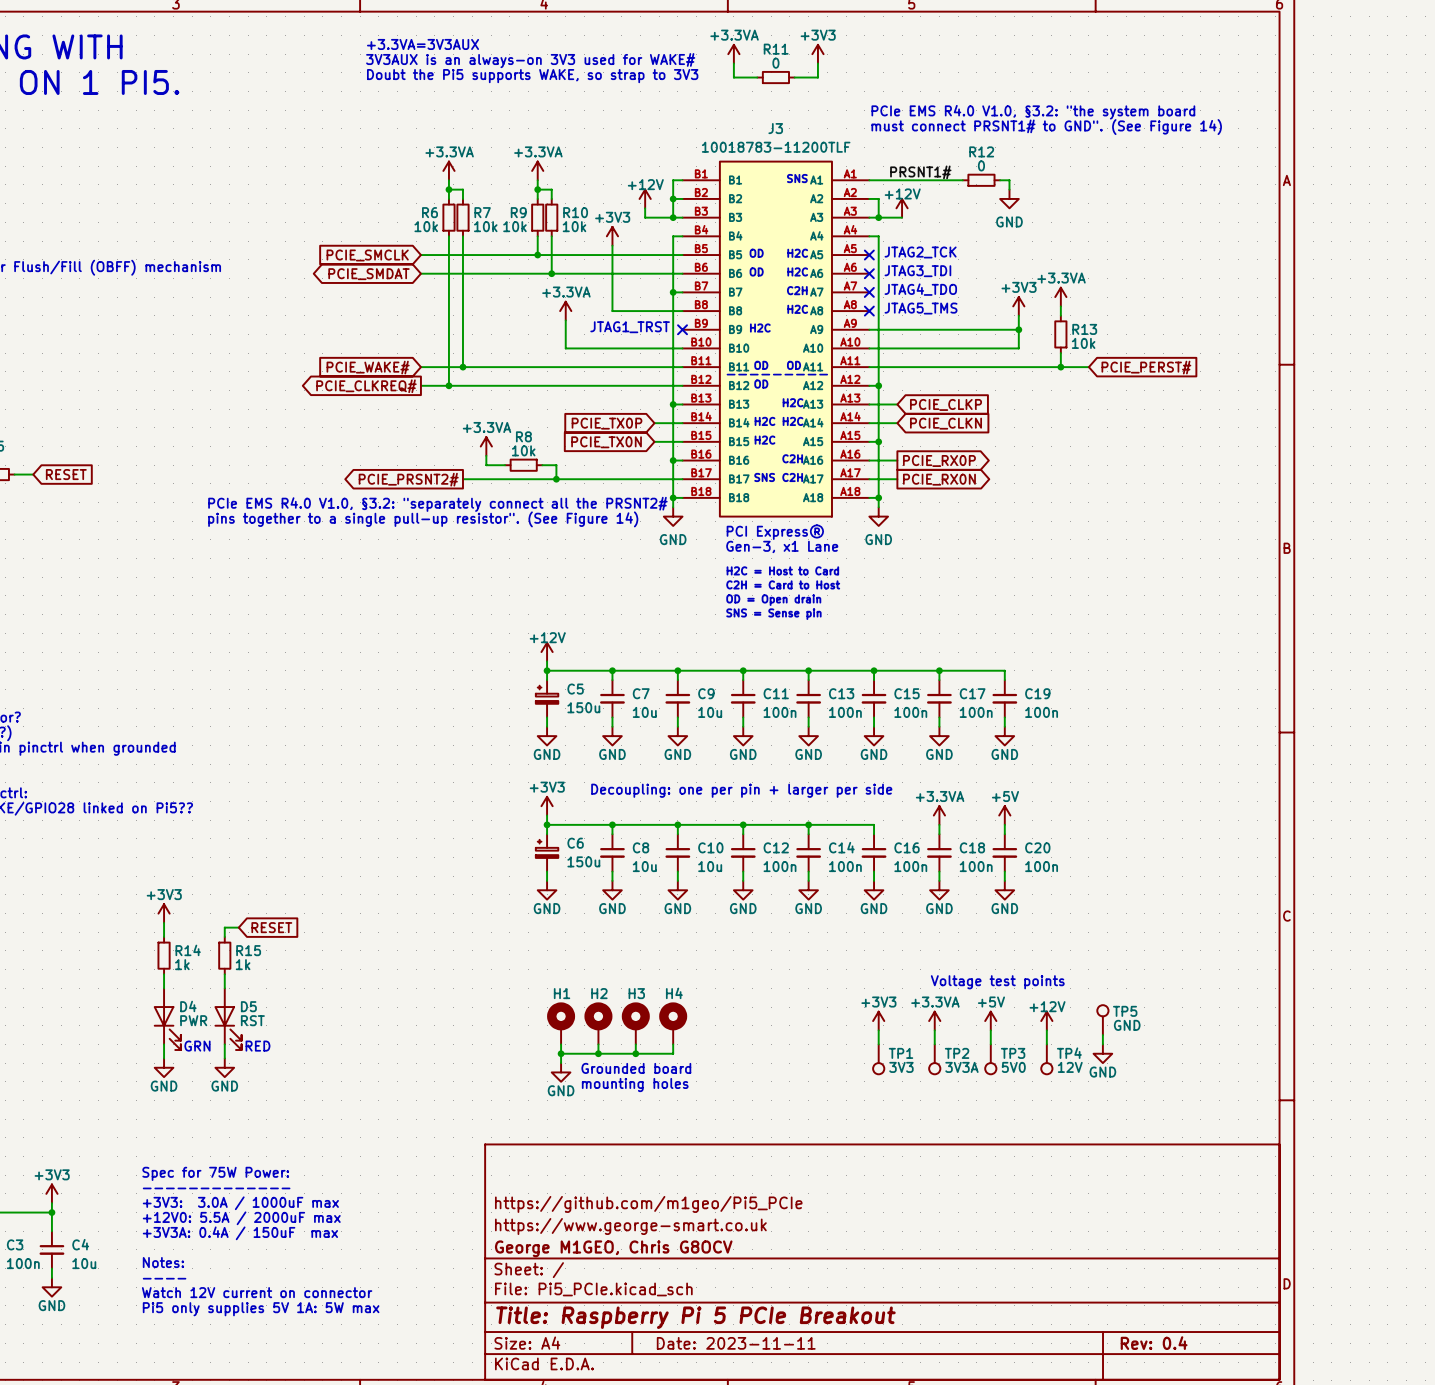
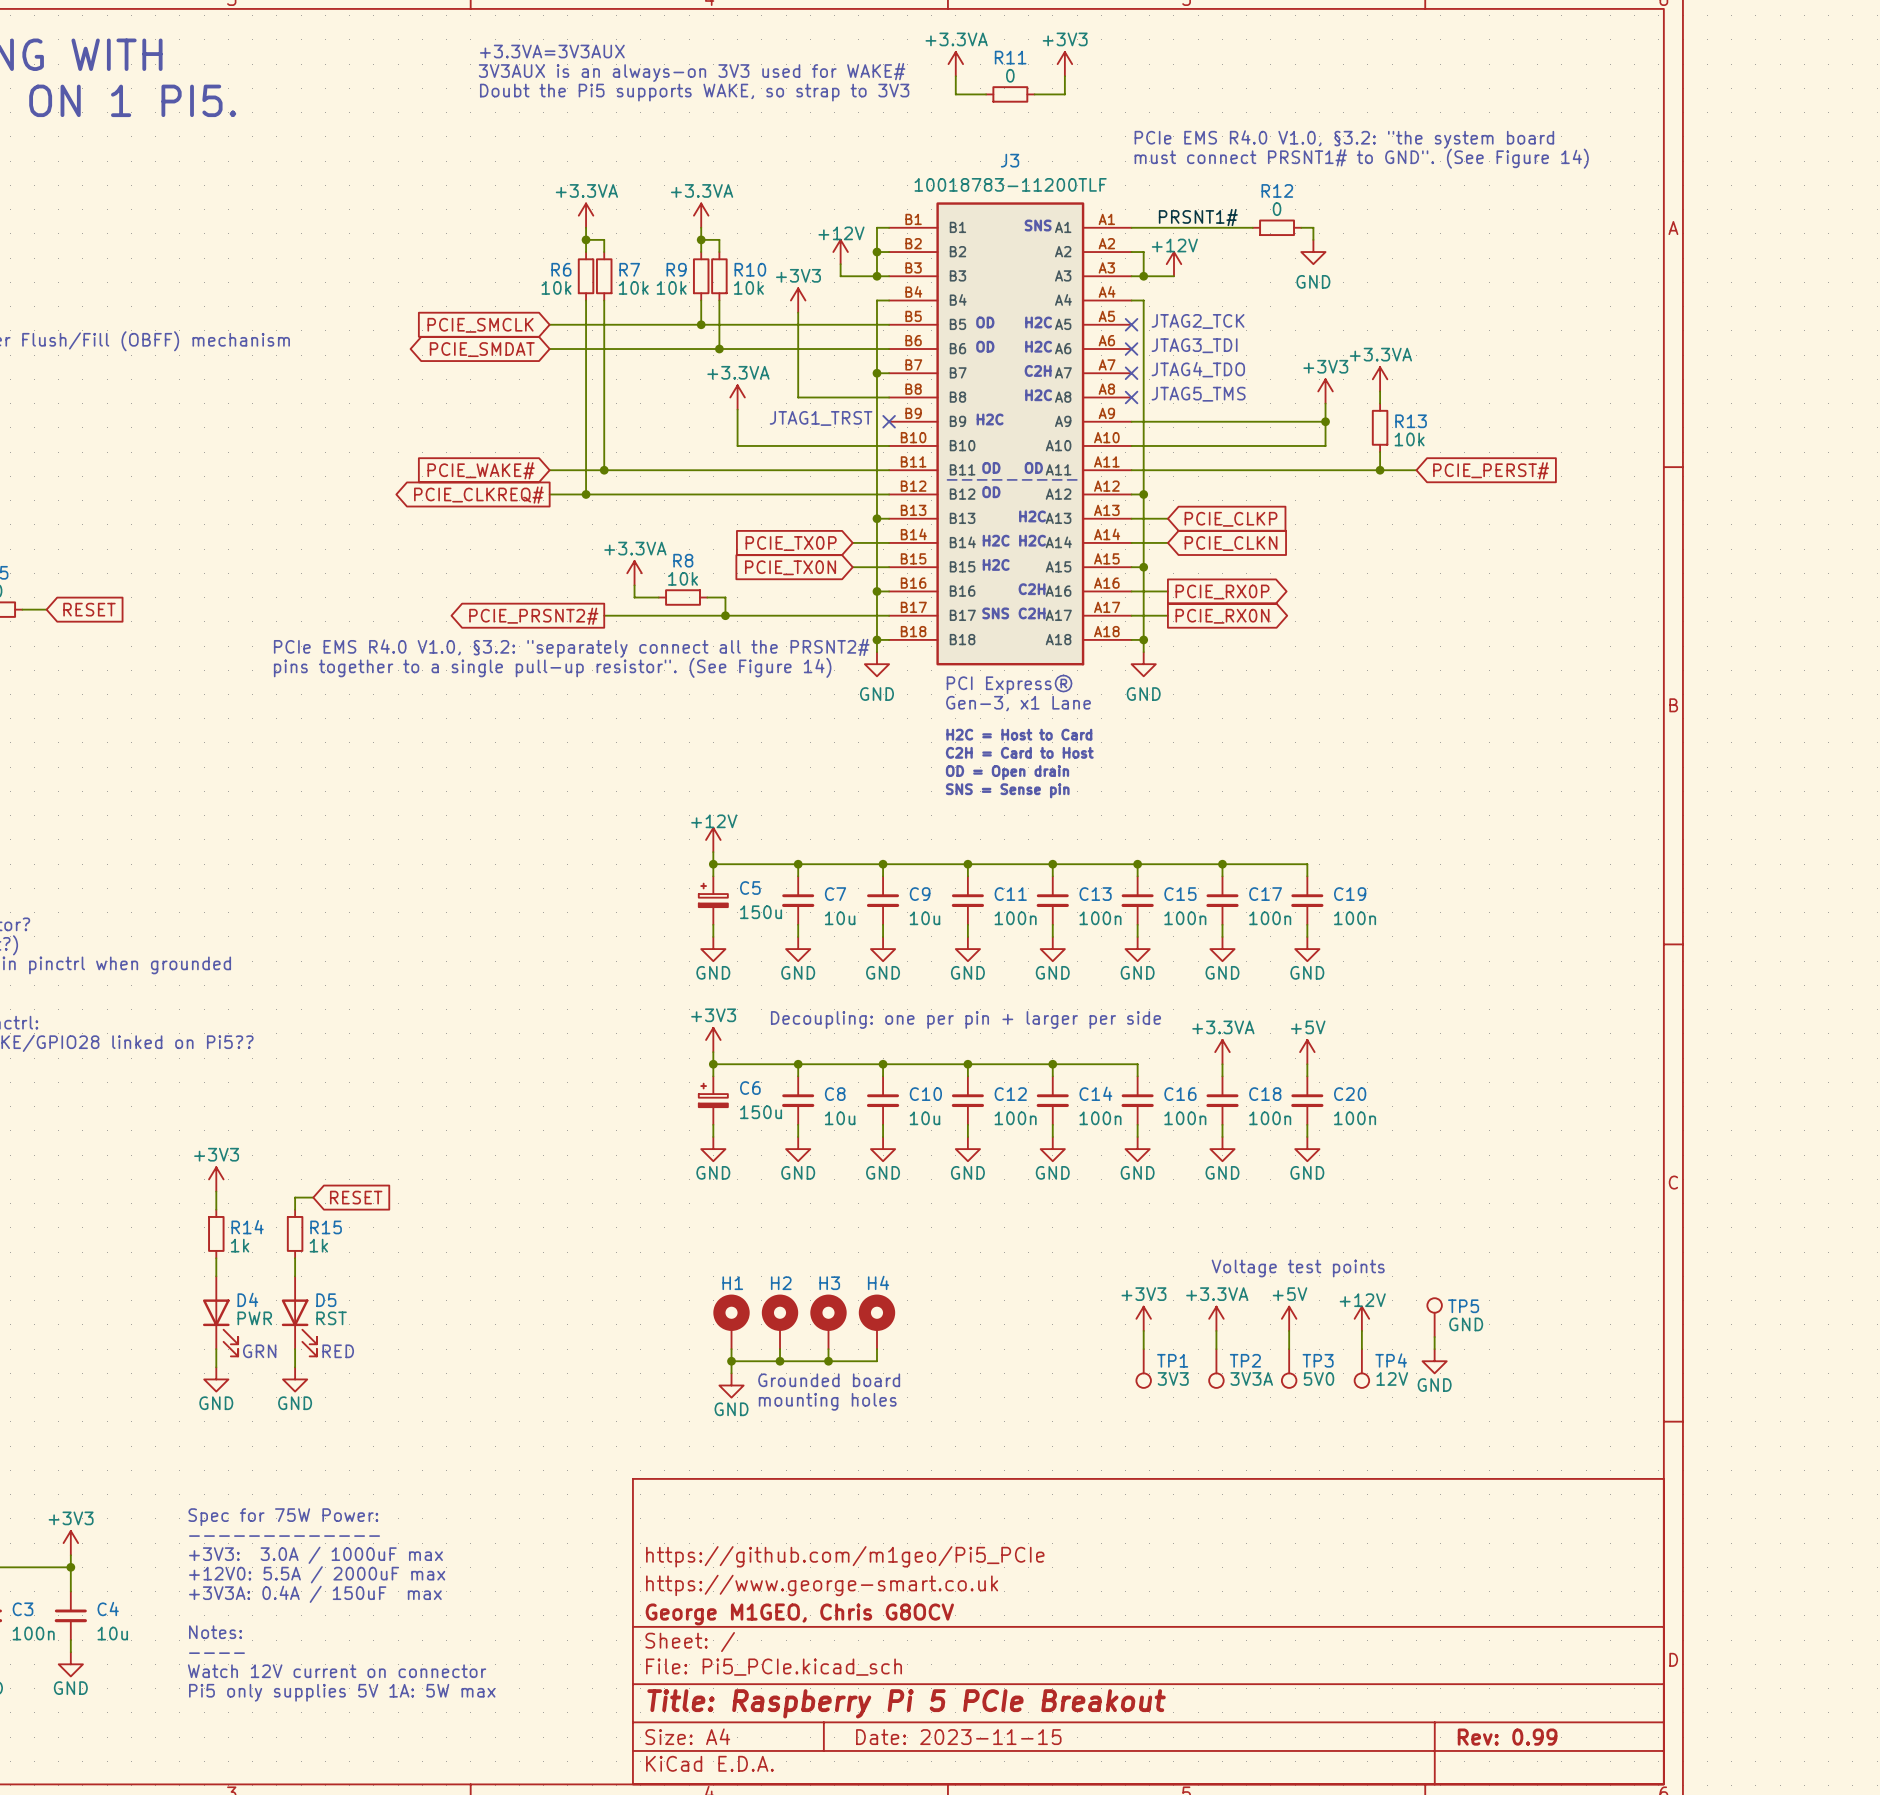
title block: Date: 2023-11-11 (736, 1343) -> Date: 2023-11-15 (958, 1737)
title block: Rev: 0.4 (1154, 1343) -> Rev: 0.99 (1507, 1737)

